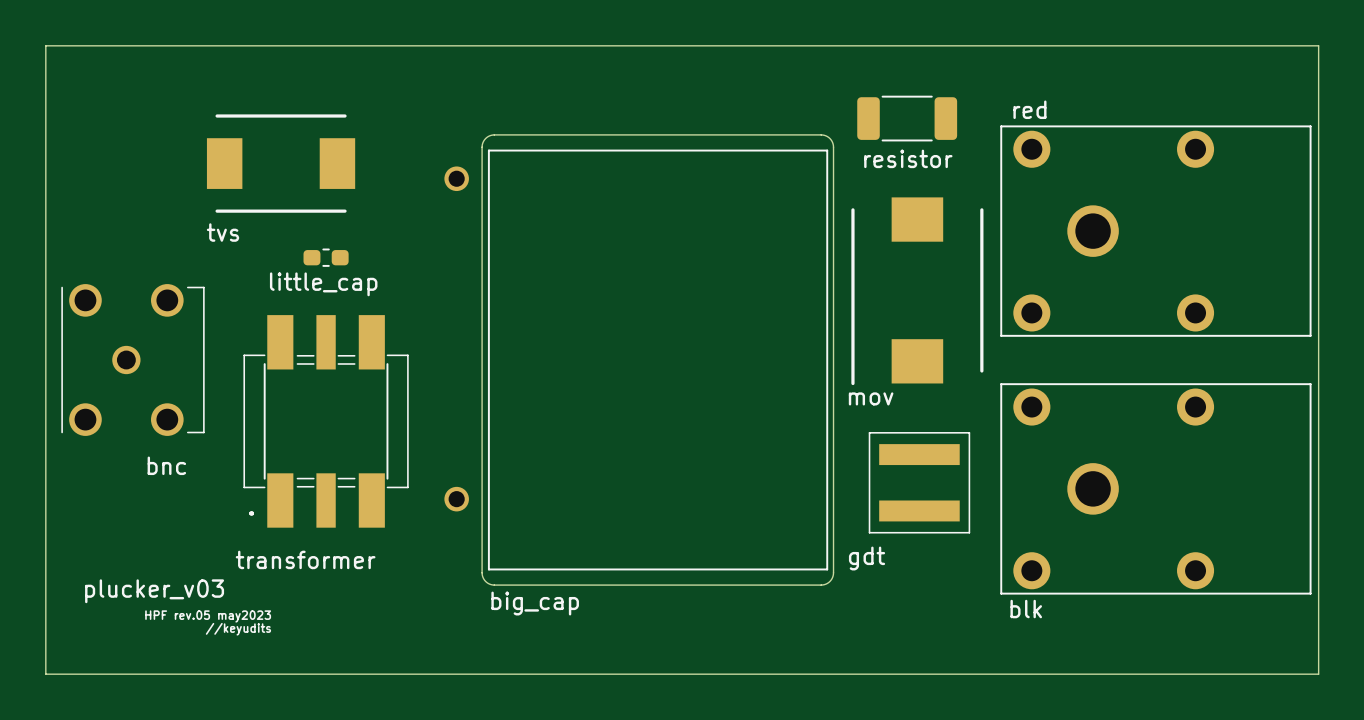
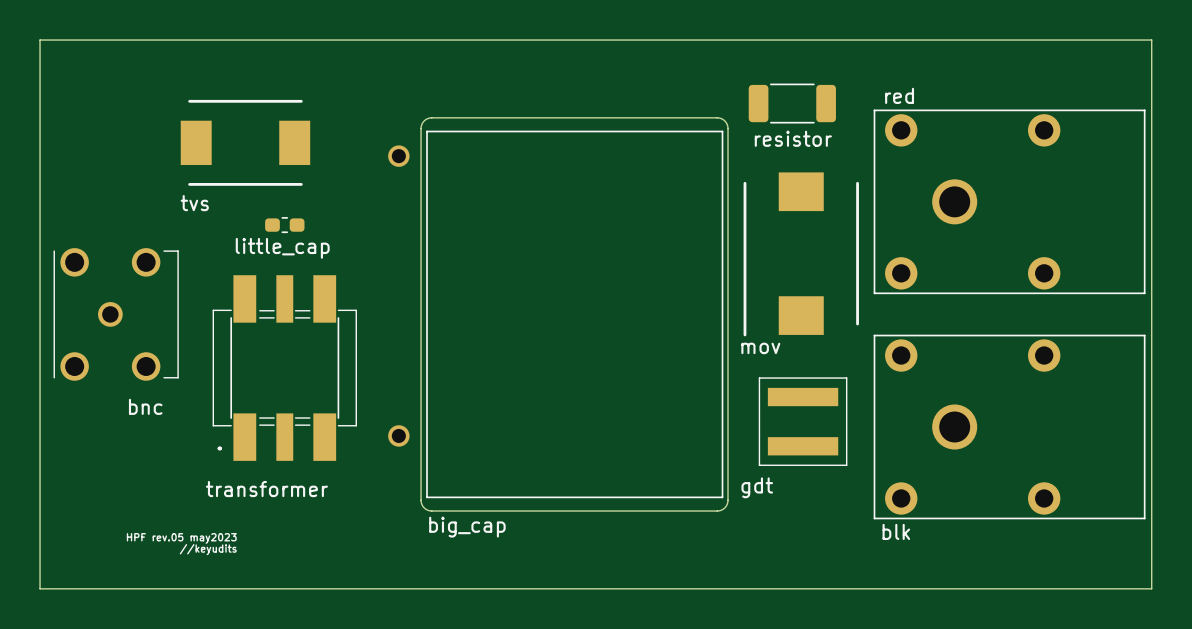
text: plucker_v03 (154, 591) -> none

